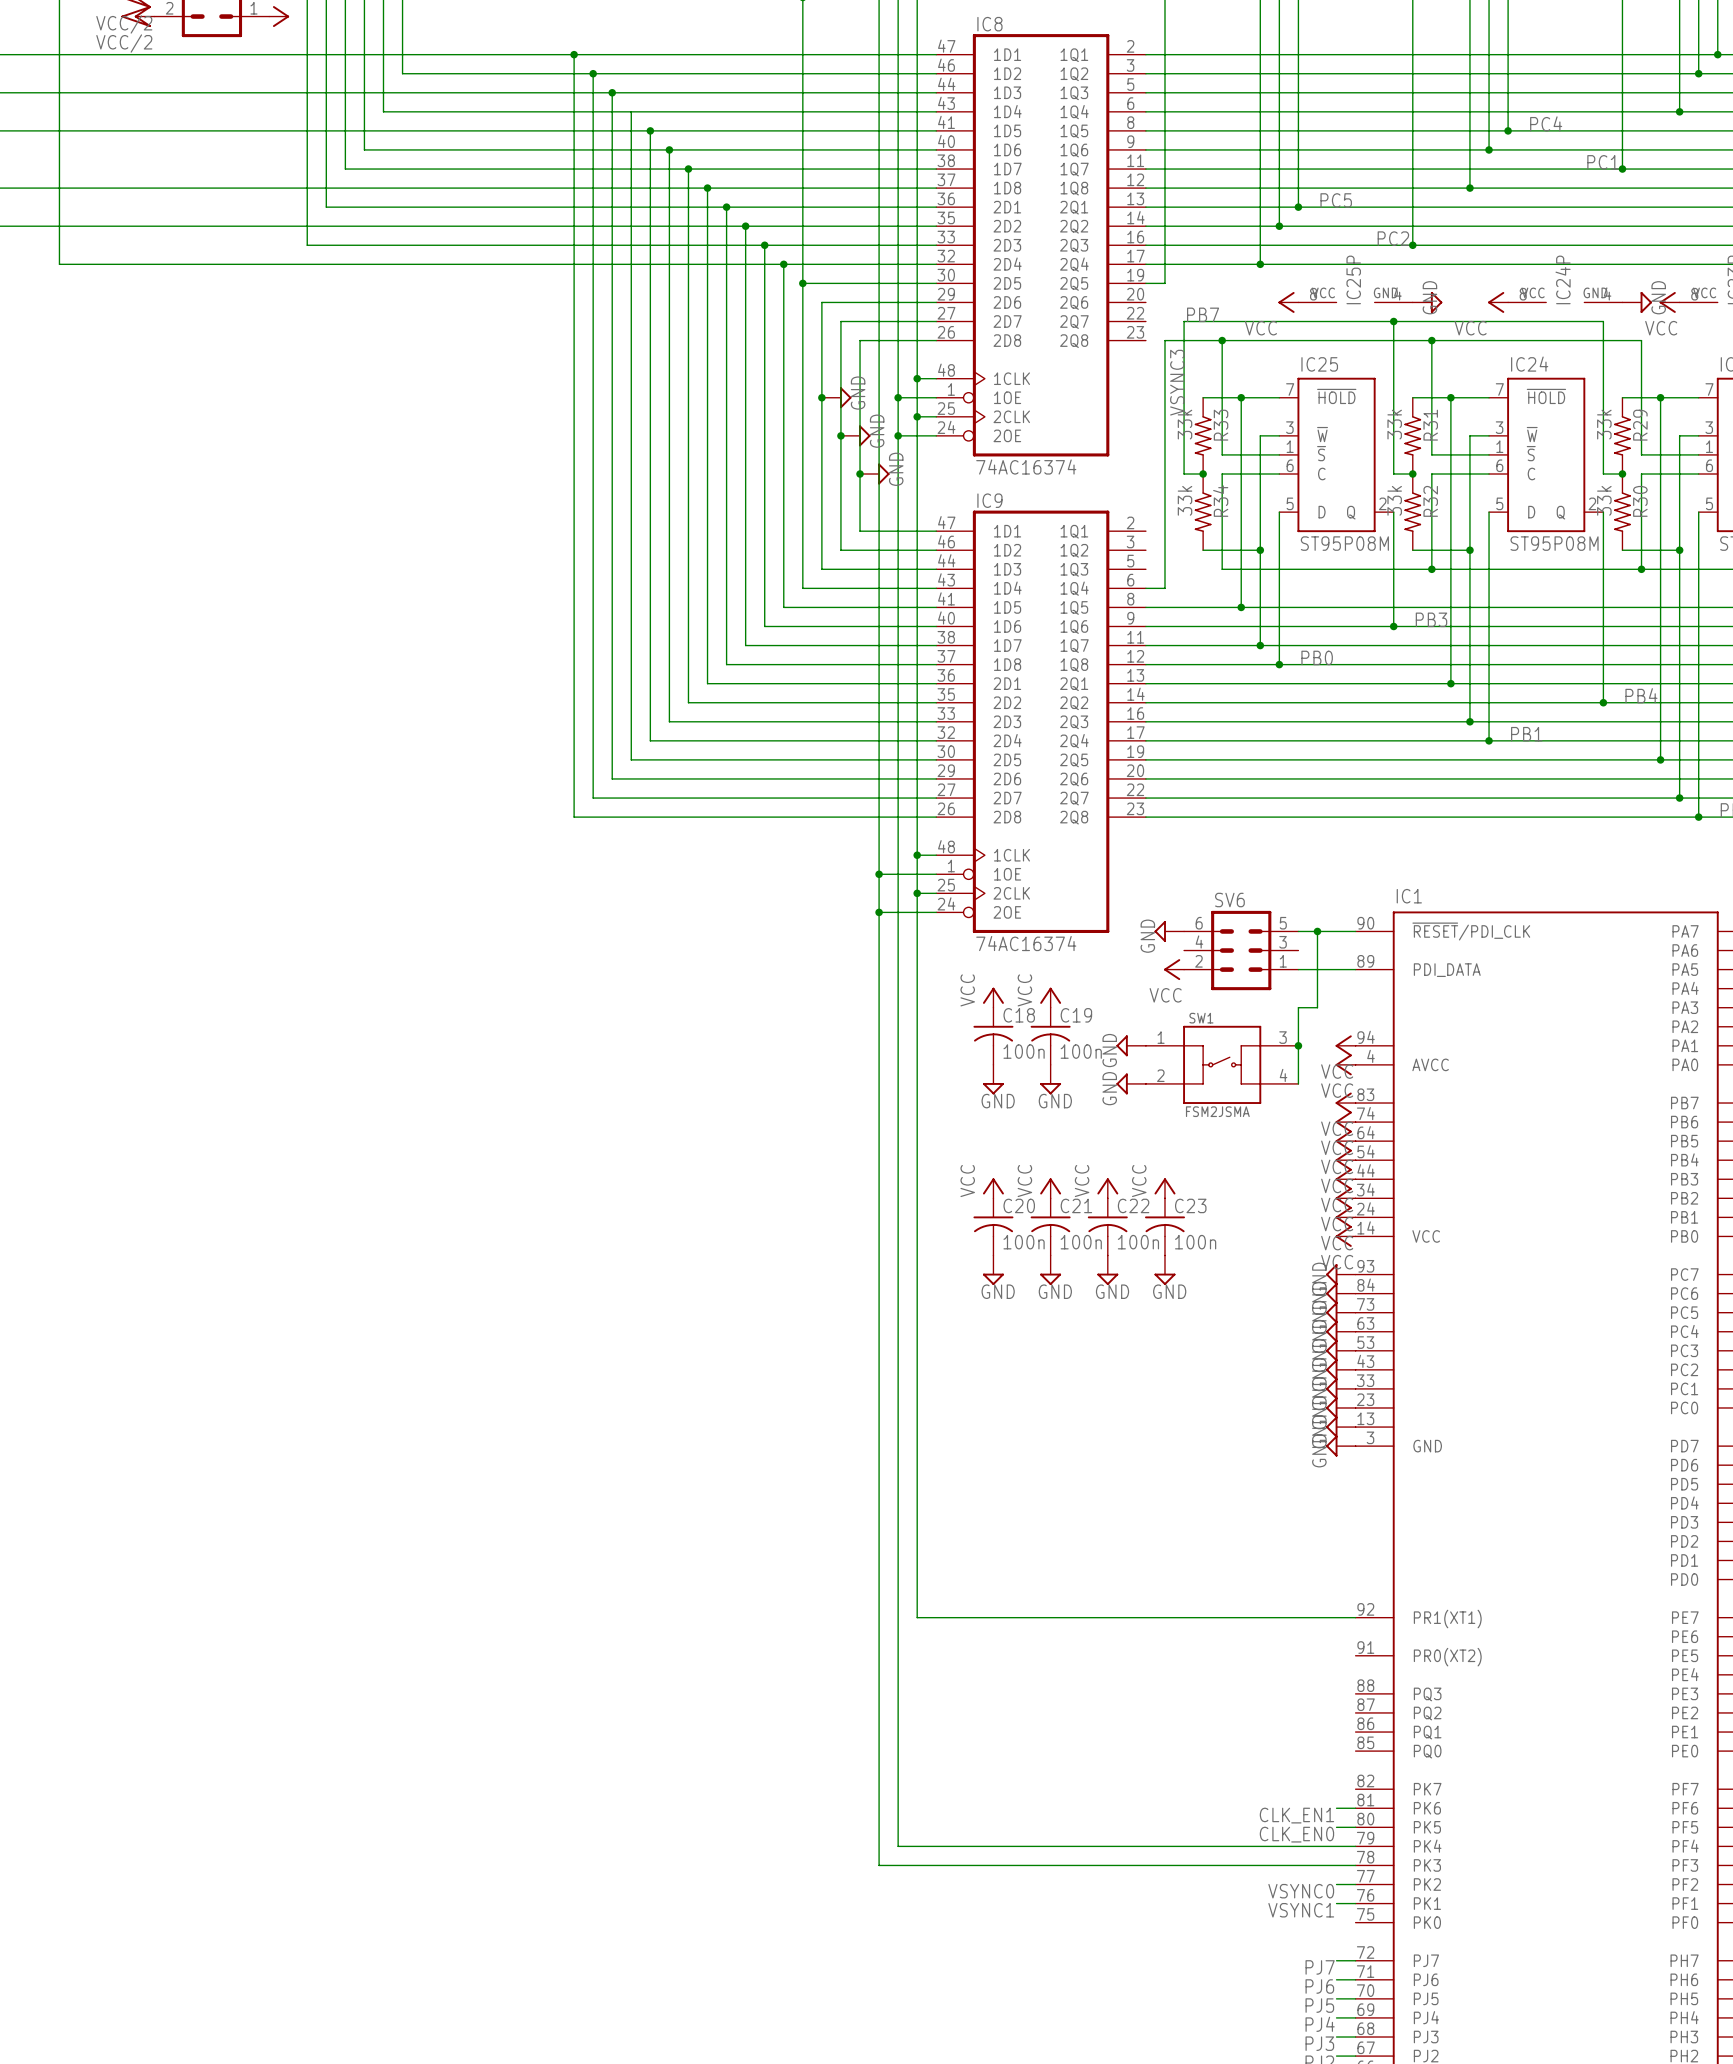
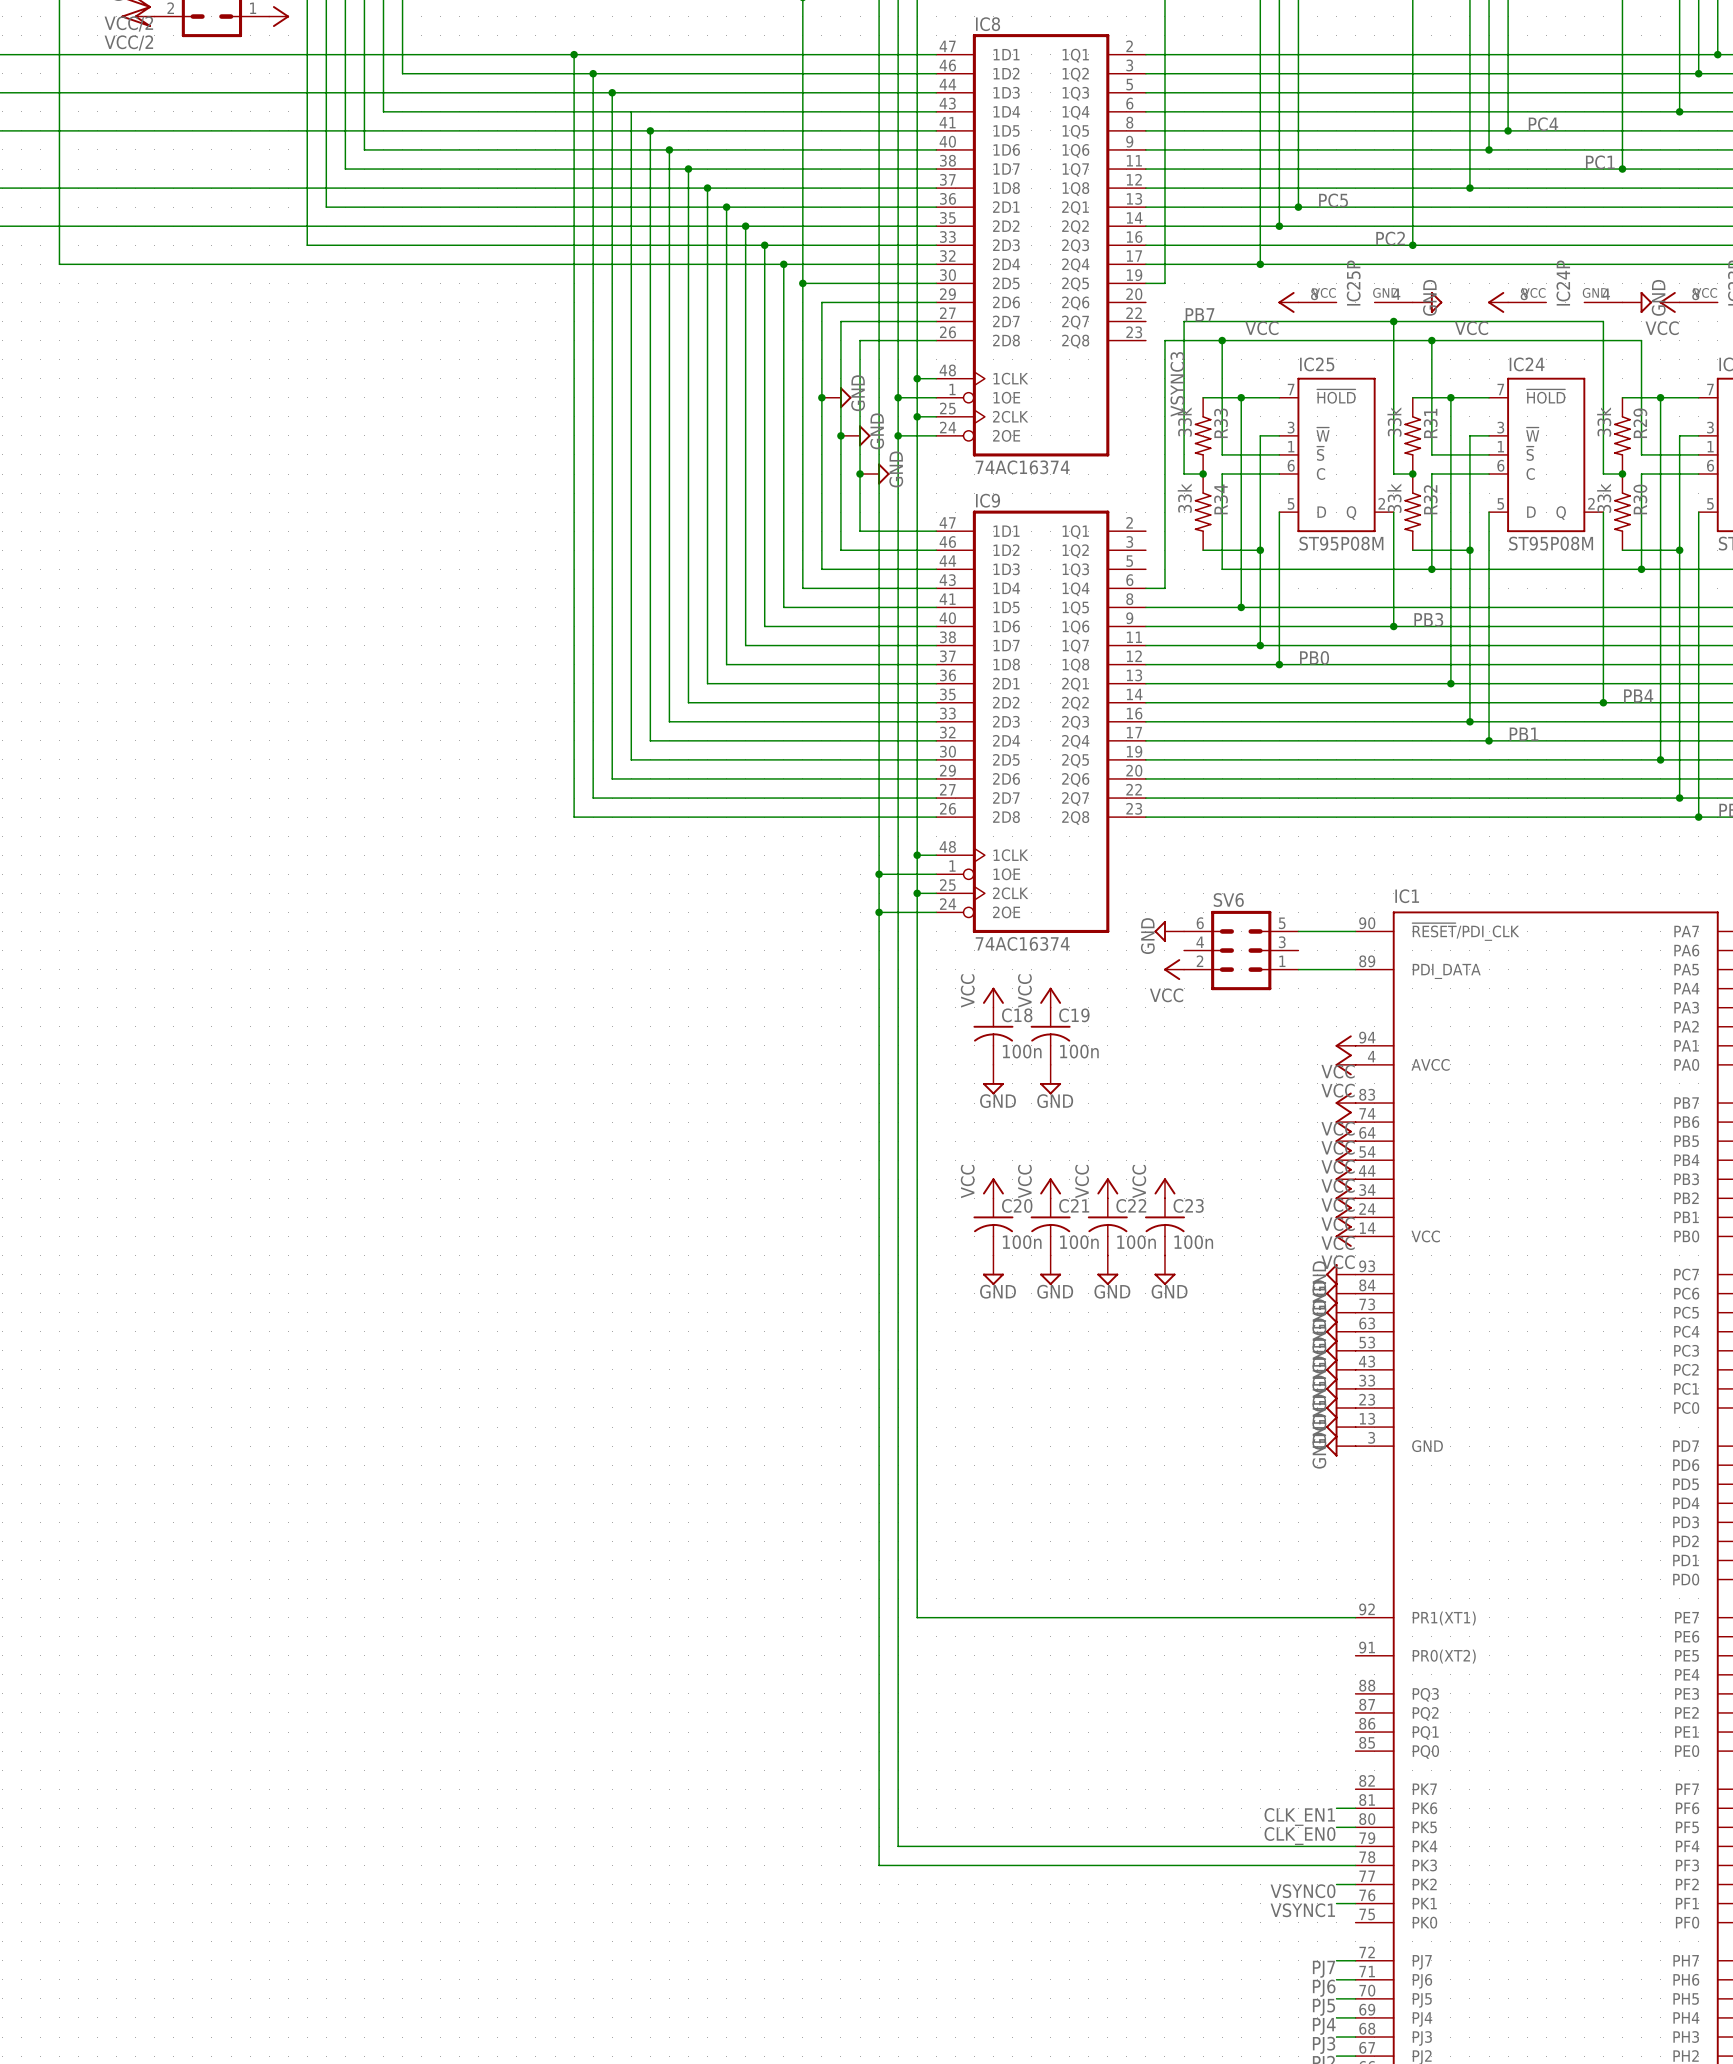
wire: (1317, 931) (1317, 1007) (1298, 1007) (1298, 1083) -> none
junction: (1317, 931) -> none
power symbol: GND (1131, 1045) -> none
junction: (1298, 1045) -> none
SW1: FSM2JSMA (1222, 1064) -> none
power symbol: GND (1131, 1083) -> none

